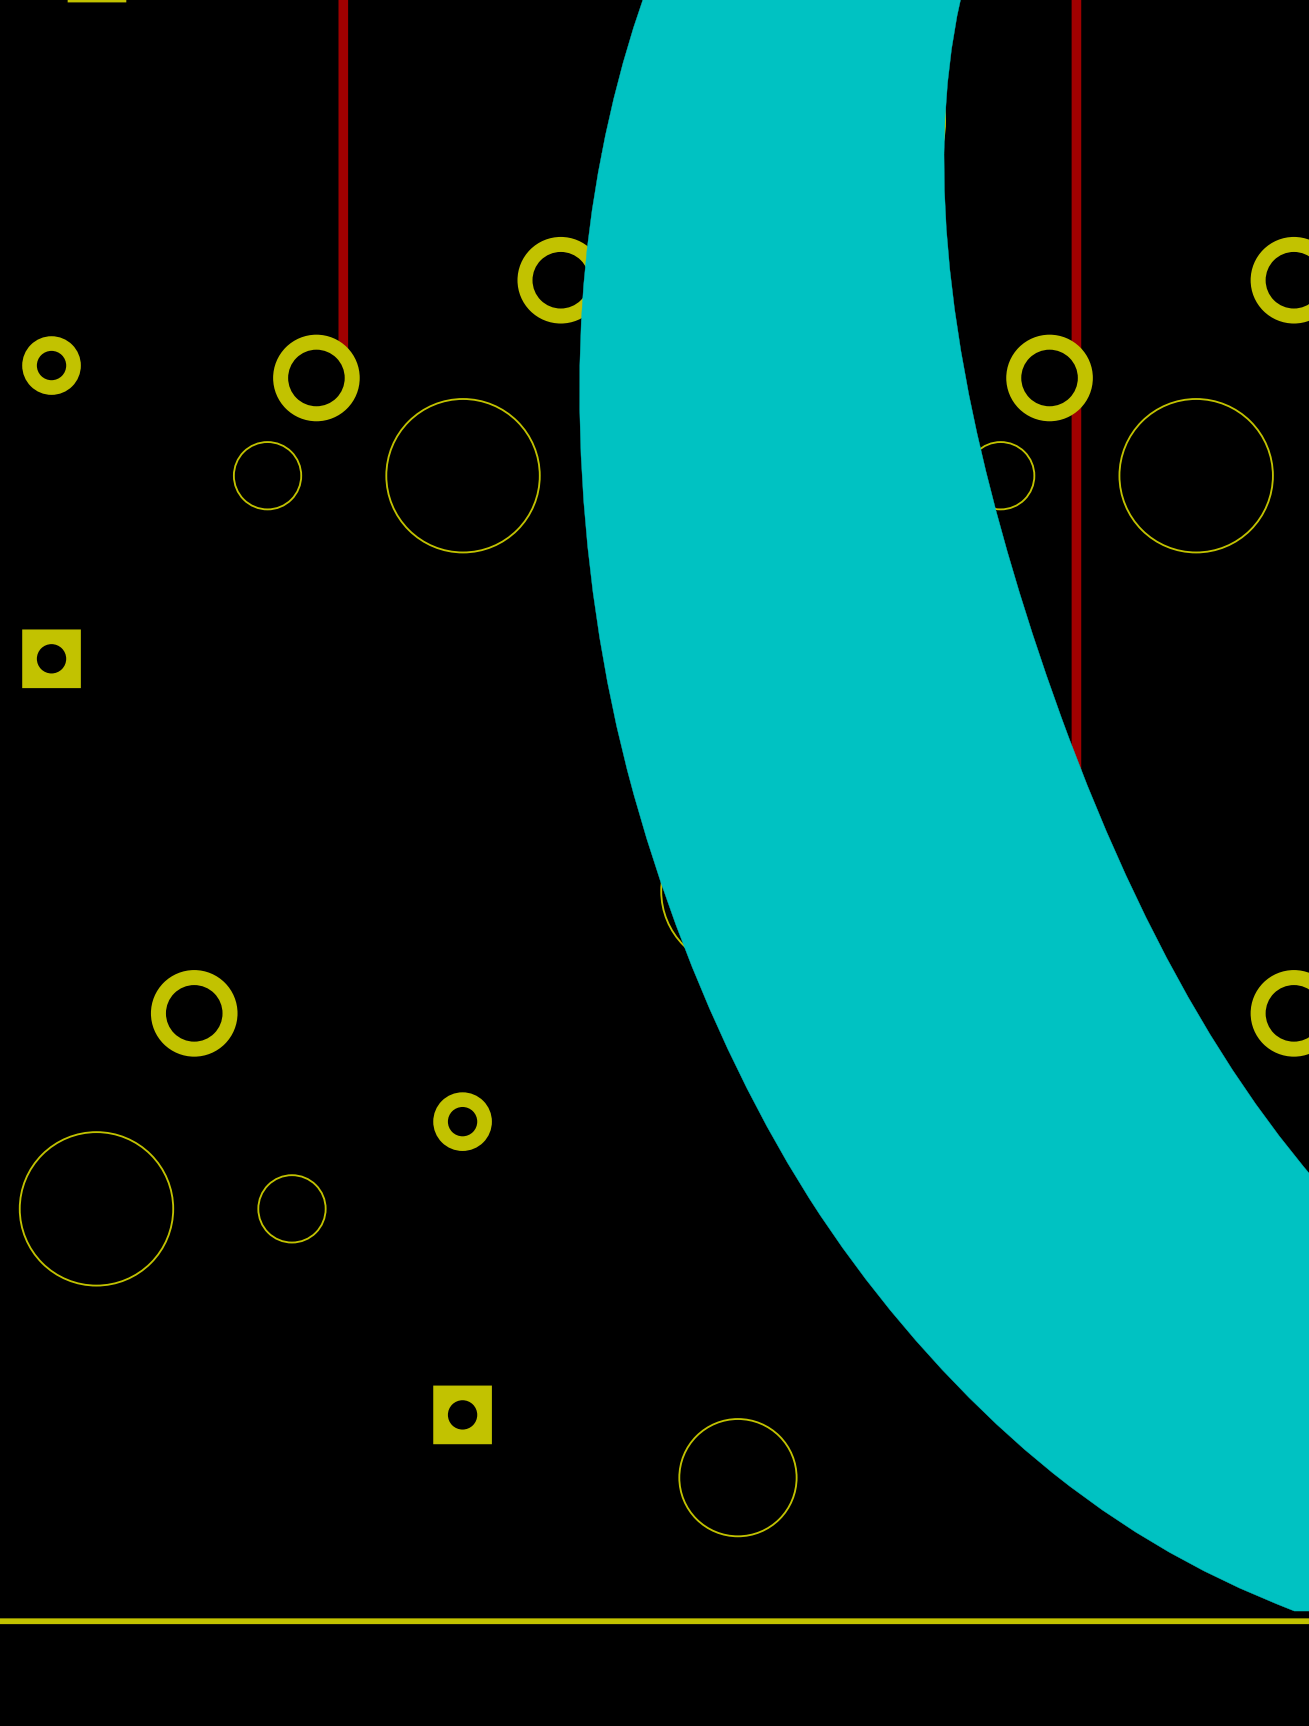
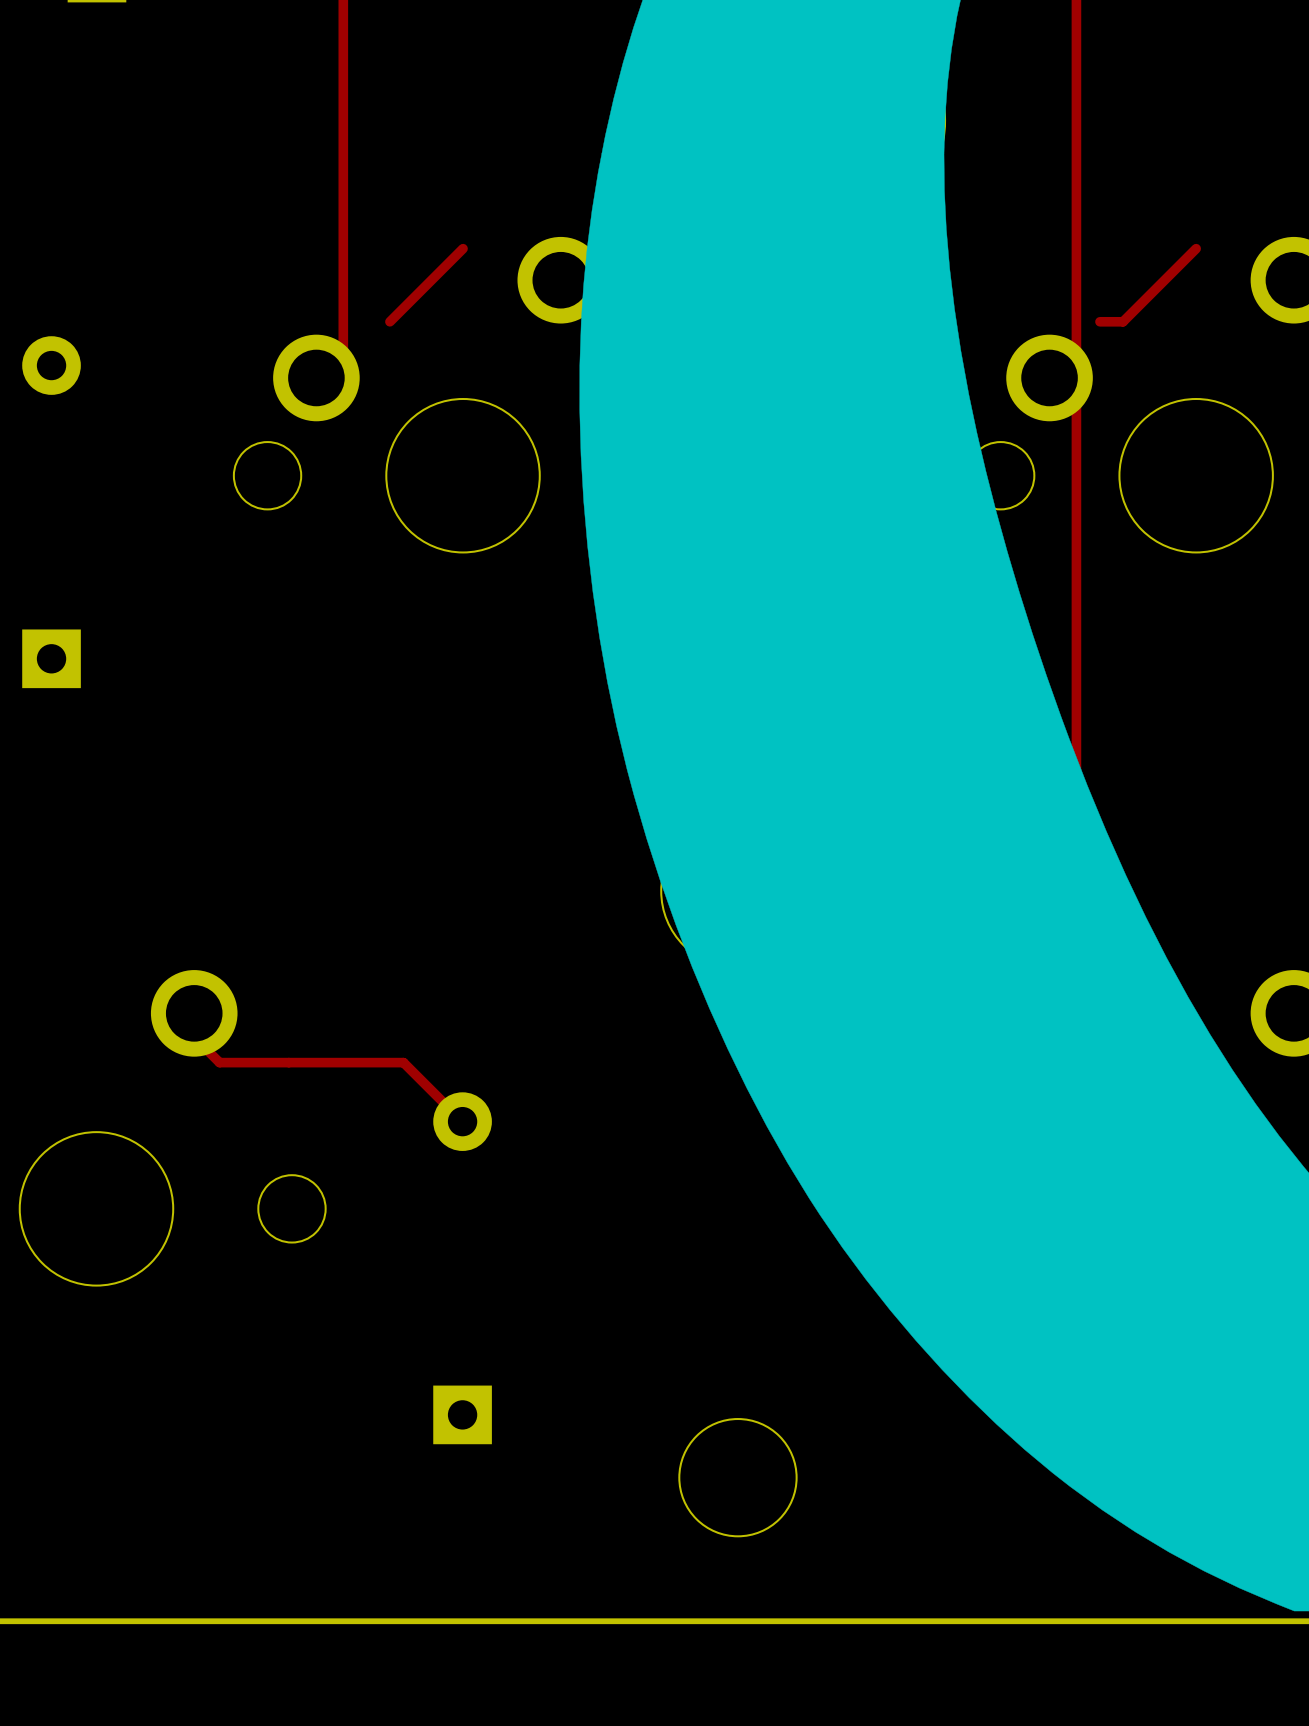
track: none -> (463, 248) (389, 321)
track: none -> (1196, 248) (1123, 321) (1099, 321)
track: none -> (192, 1035) (219, 1062) (403, 1062) (462, 1121)

